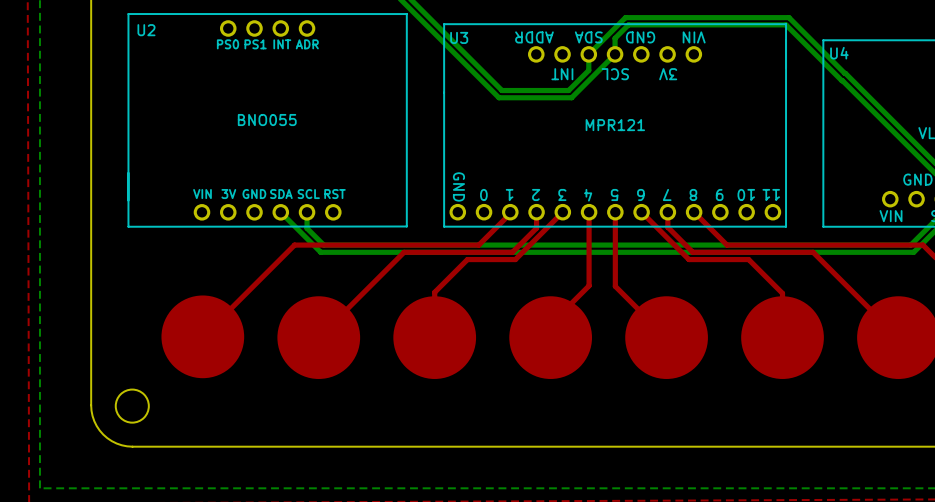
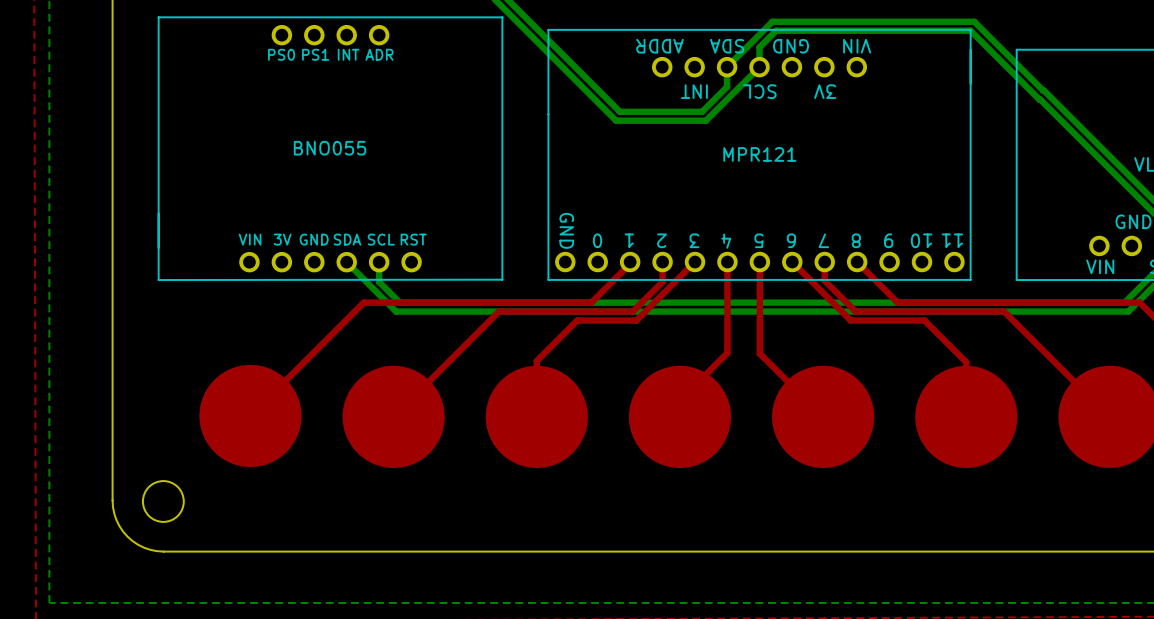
U2 name: U2 (146, 30) -> none
U3 name: U3 (459, 37) -> none
U4 name: U4 (839, 53) -> none

